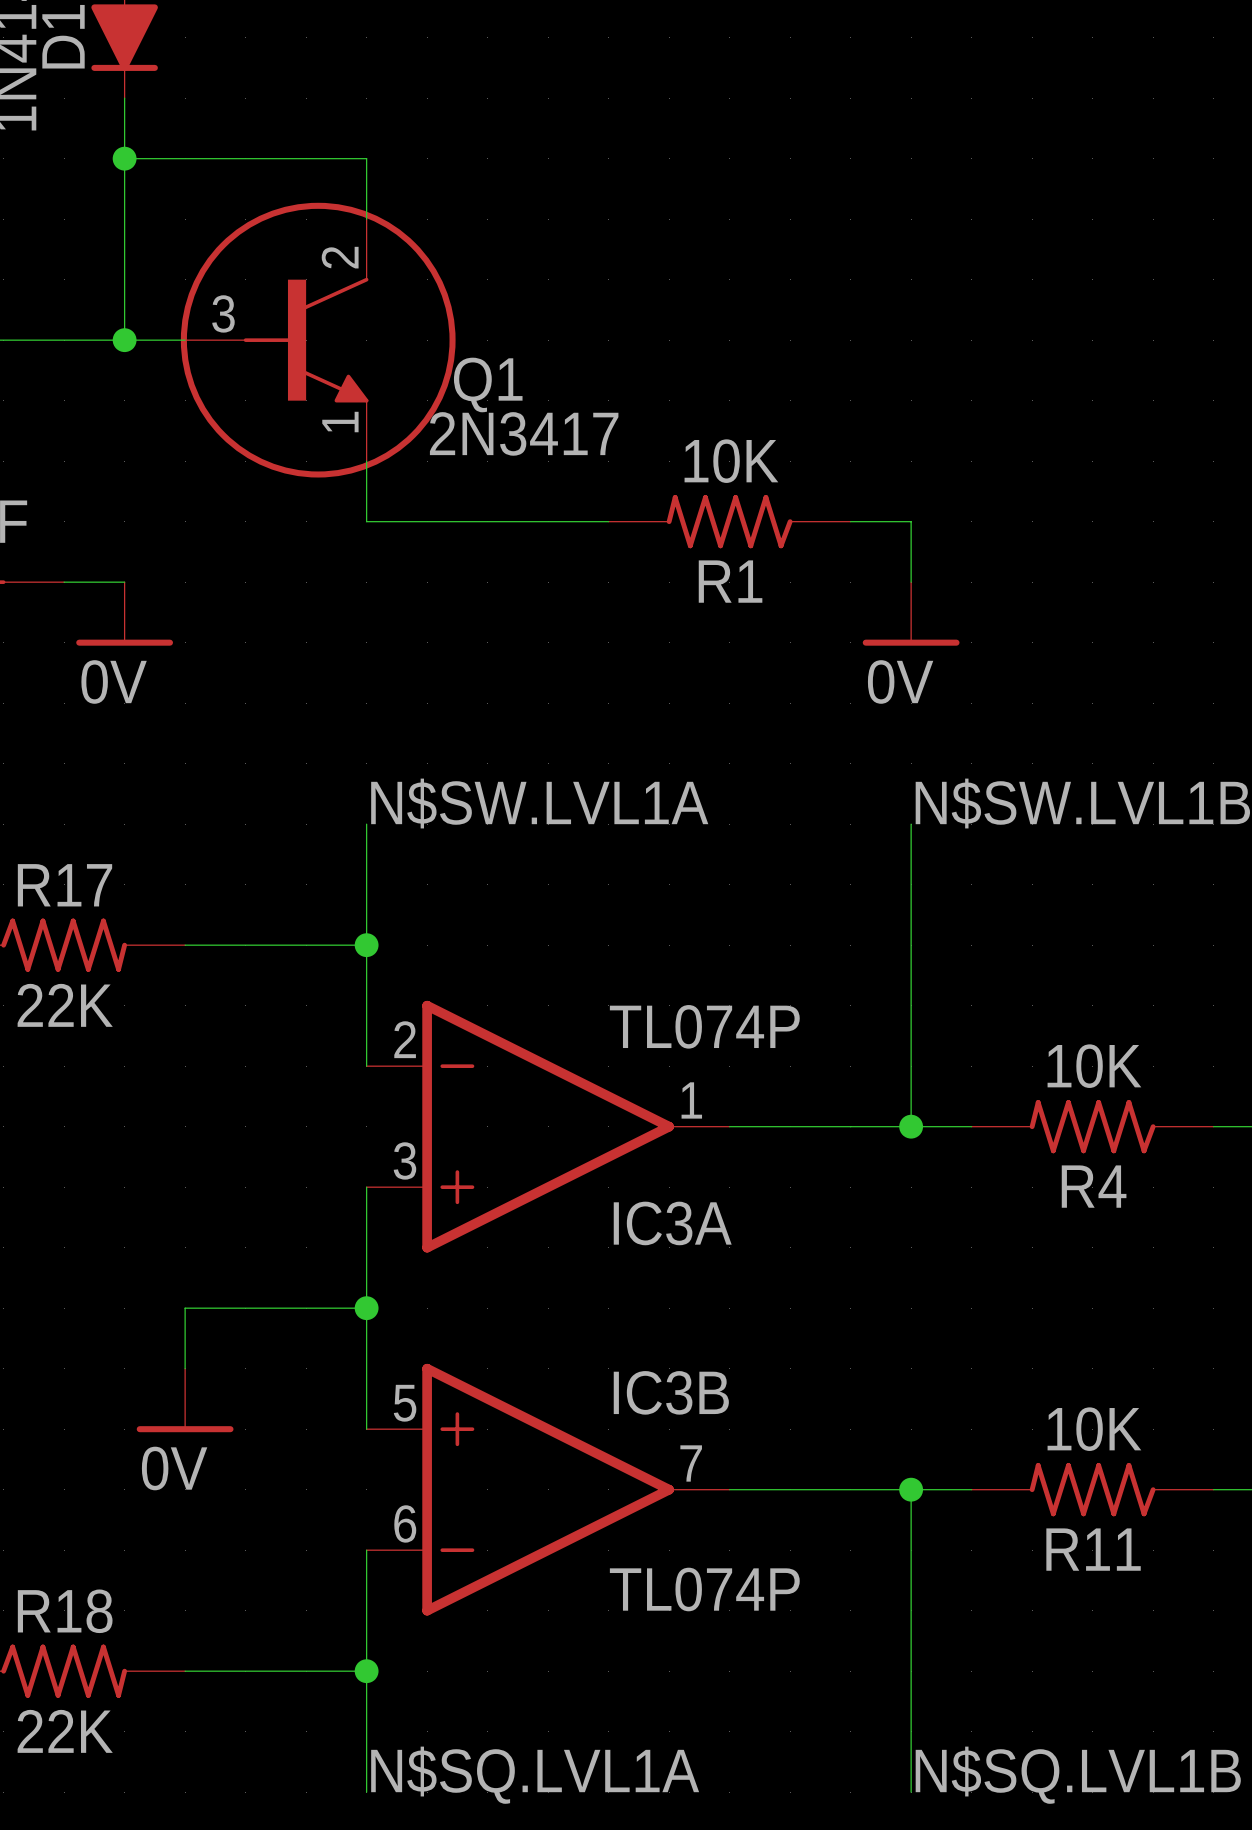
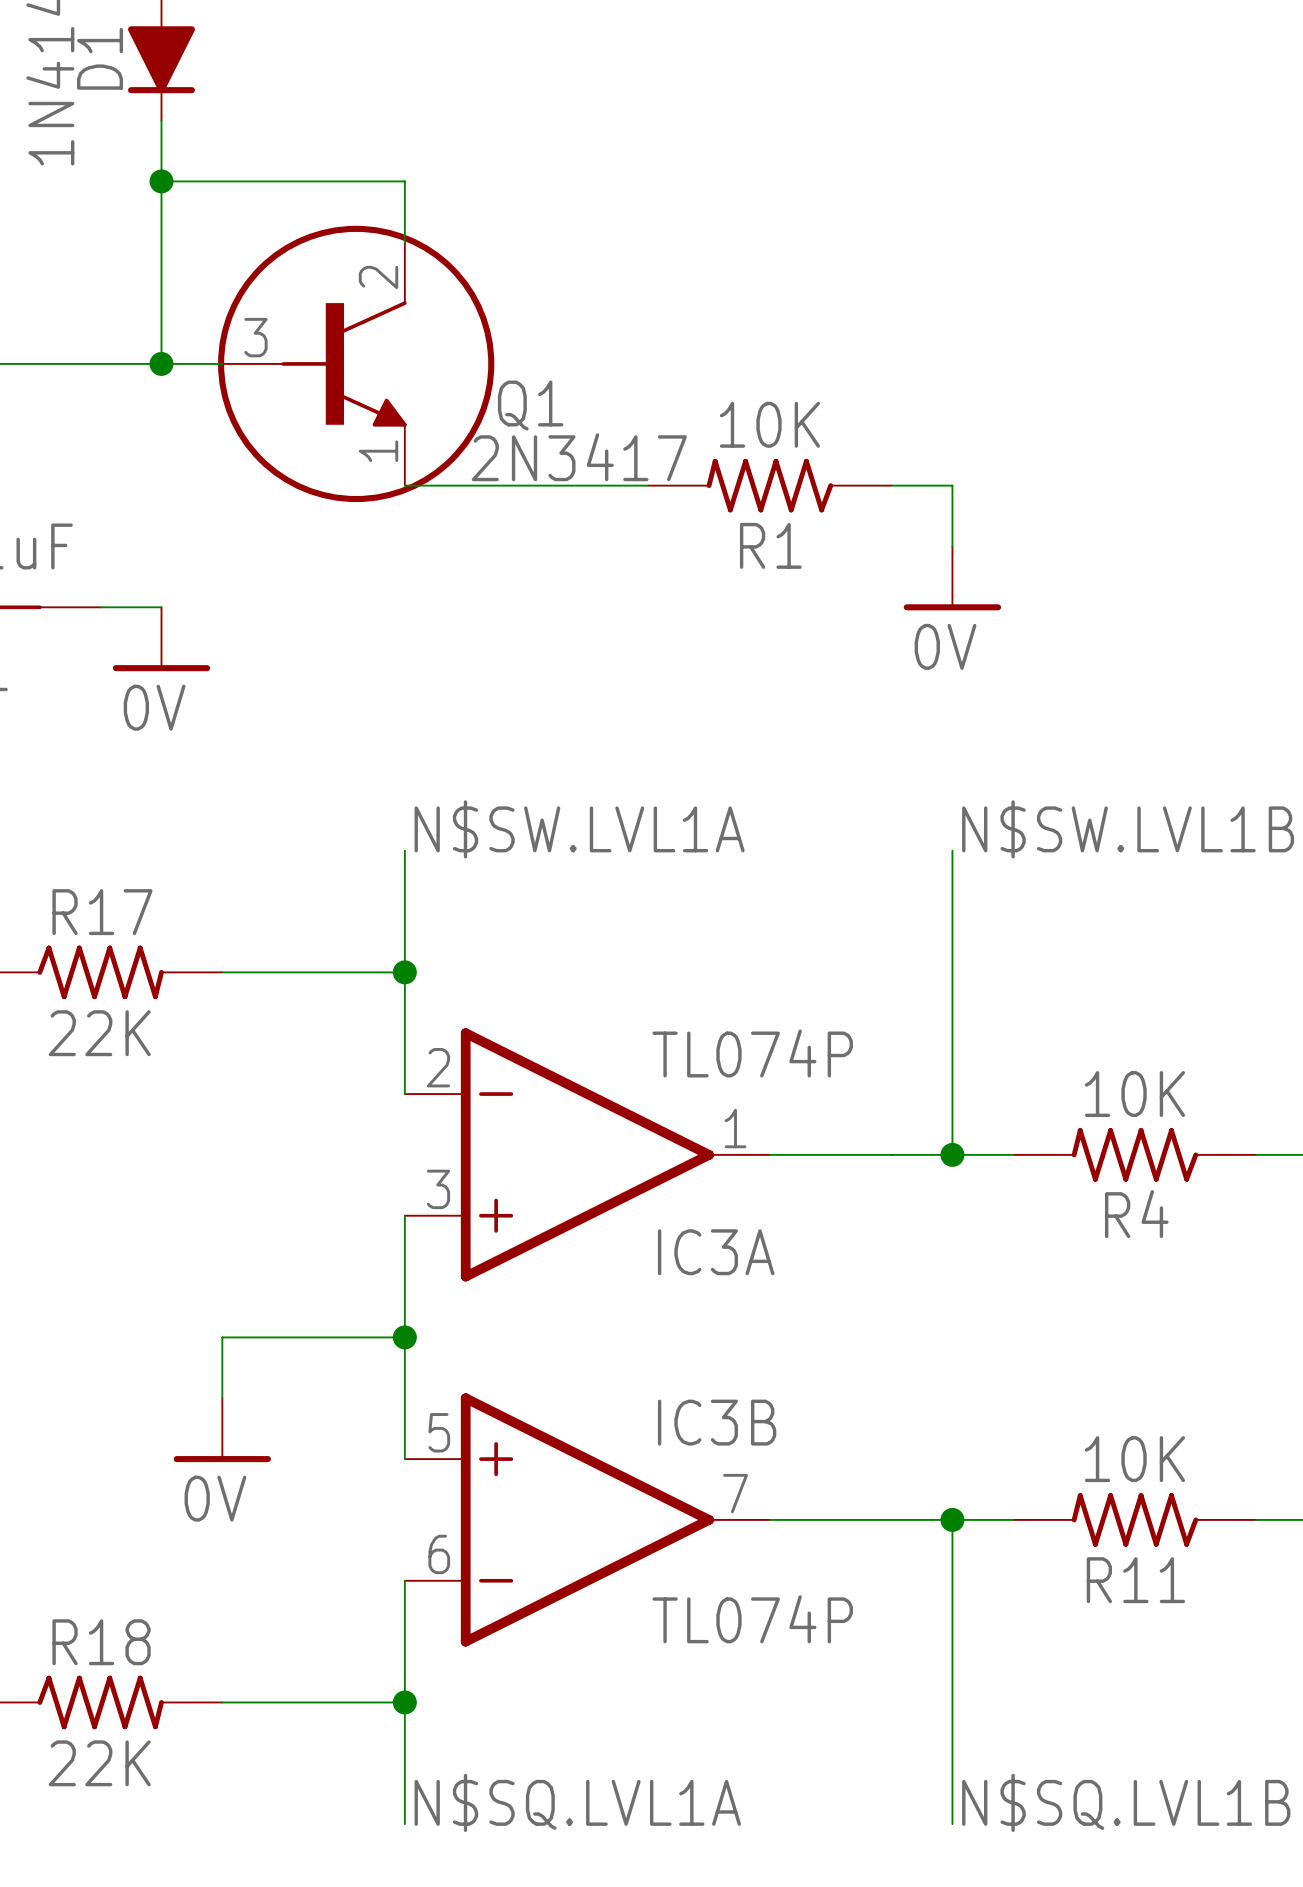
wire: (366, 461) (366, 521) (608, 521) -> (404, 485) (648, 485)
R1 position: (729, 521) -> (769, 485)
wire: (850, 521) (911, 521) (911, 582) -> (891, 485) (952, 485) (952, 546)
power symbol position: 0V (911, 613) -> 0V (952, 578)

